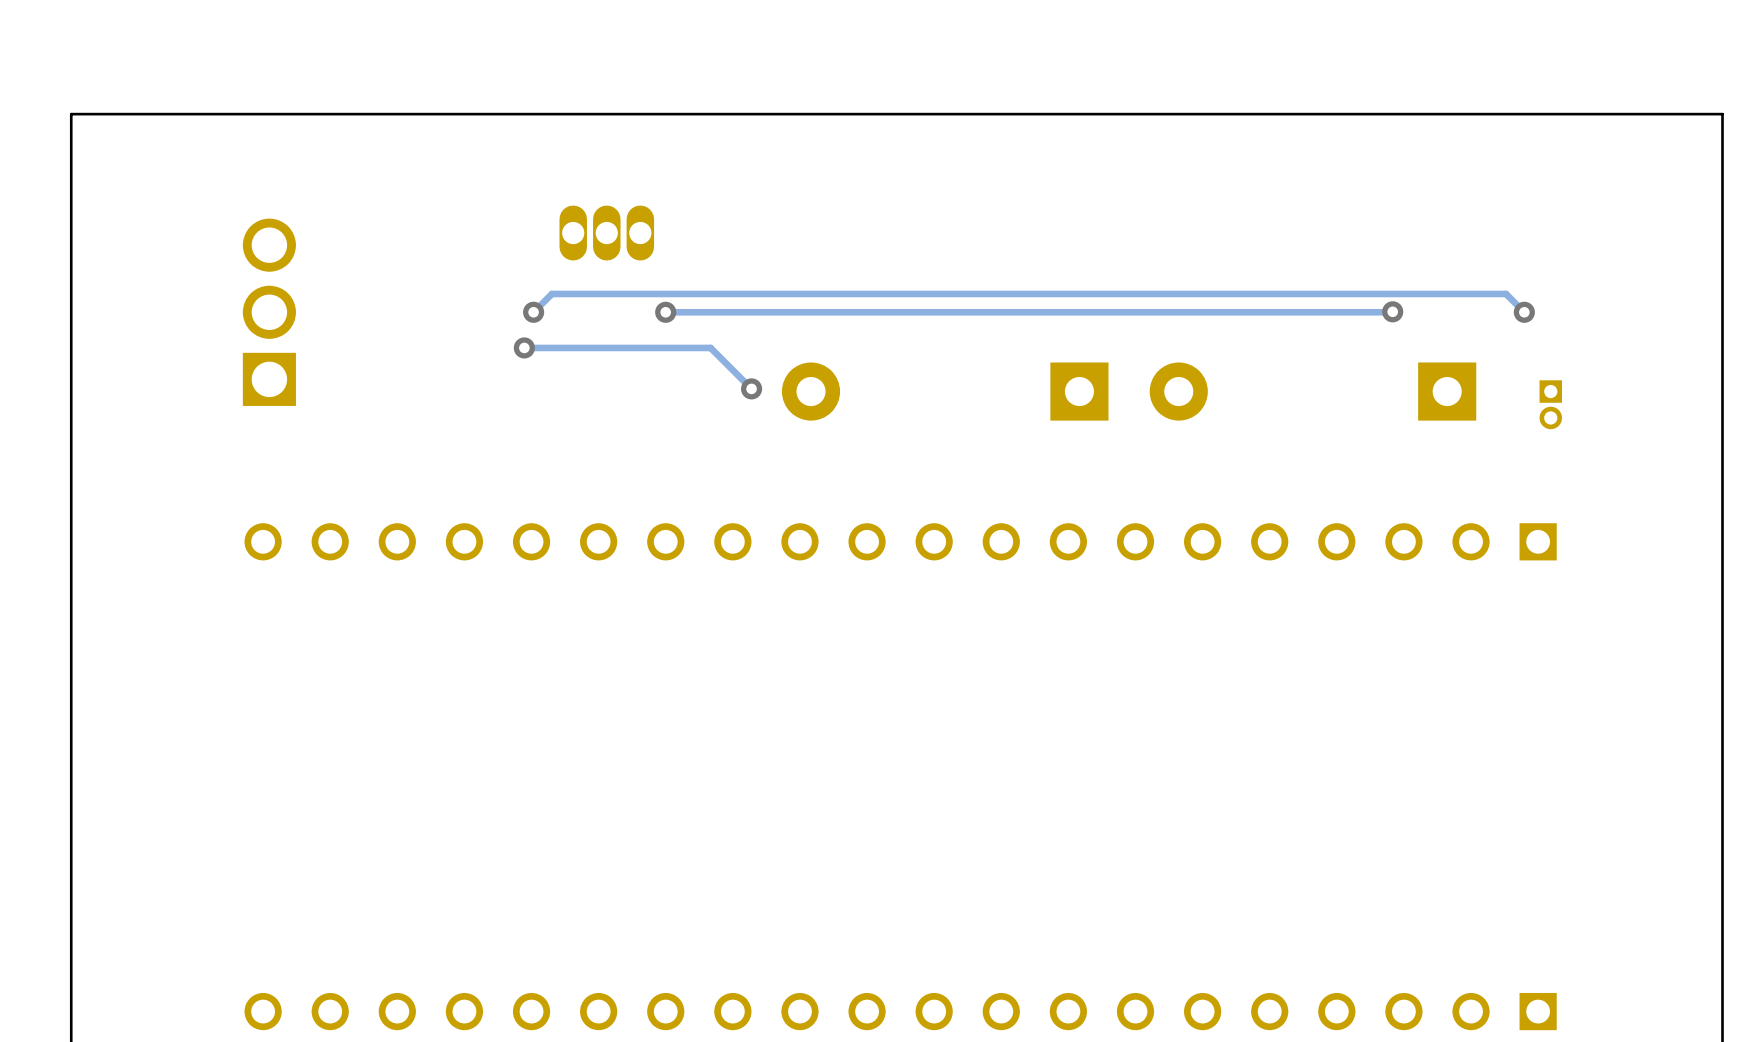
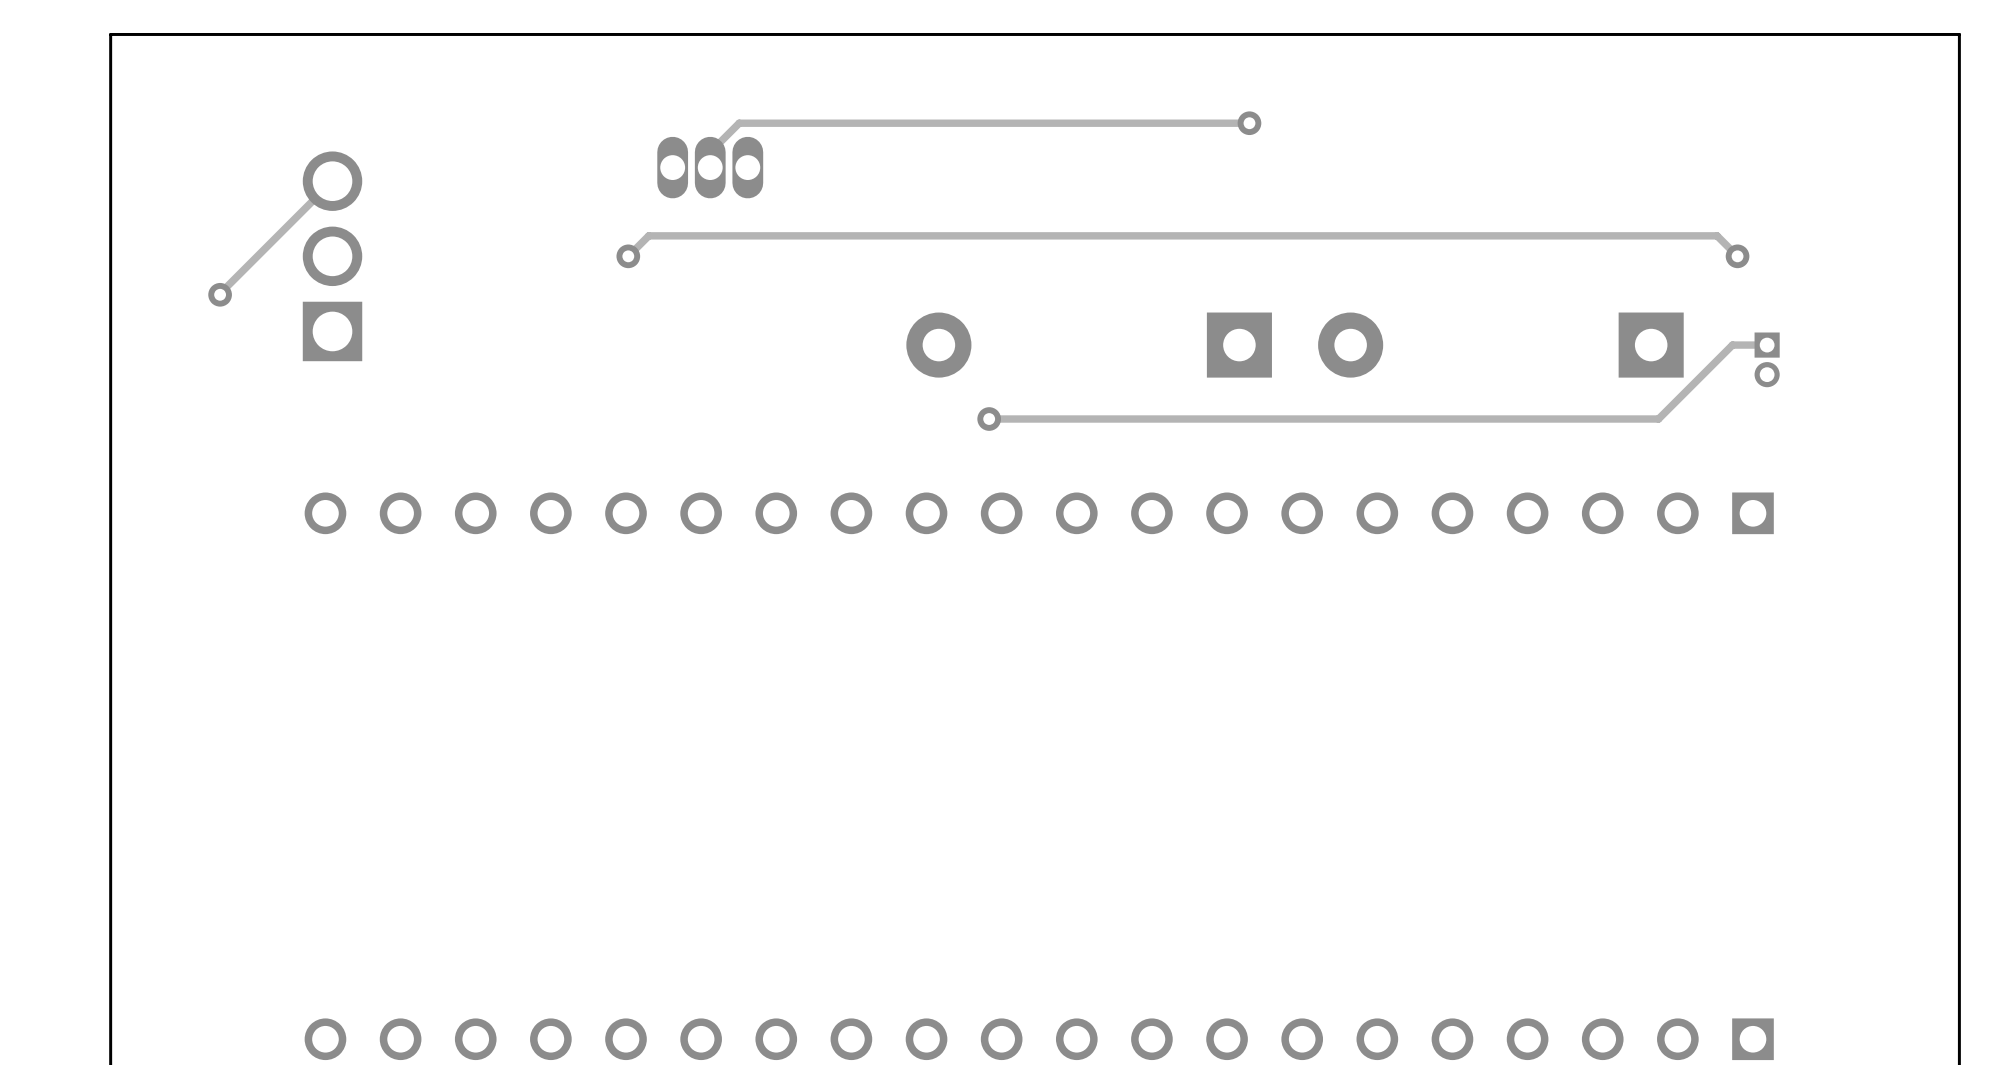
track: none -> (1249, 123) (739, 123) (710, 152) (710, 167)
via: none -> (1249, 123)
track: none -> (332, 181) (220, 294)
track: (1392, 311) (665, 312) -> none
via: (1392, 311) -> none
via: (665, 312) -> none
via: none -> (220, 294)
track: (524, 347) (710, 347) (751, 388) -> none
via: (524, 347) -> none
via: (751, 388) -> none
track: none -> (1767, 345) (1732, 345) (1658, 419) (989, 419)
via: none -> (989, 419)

